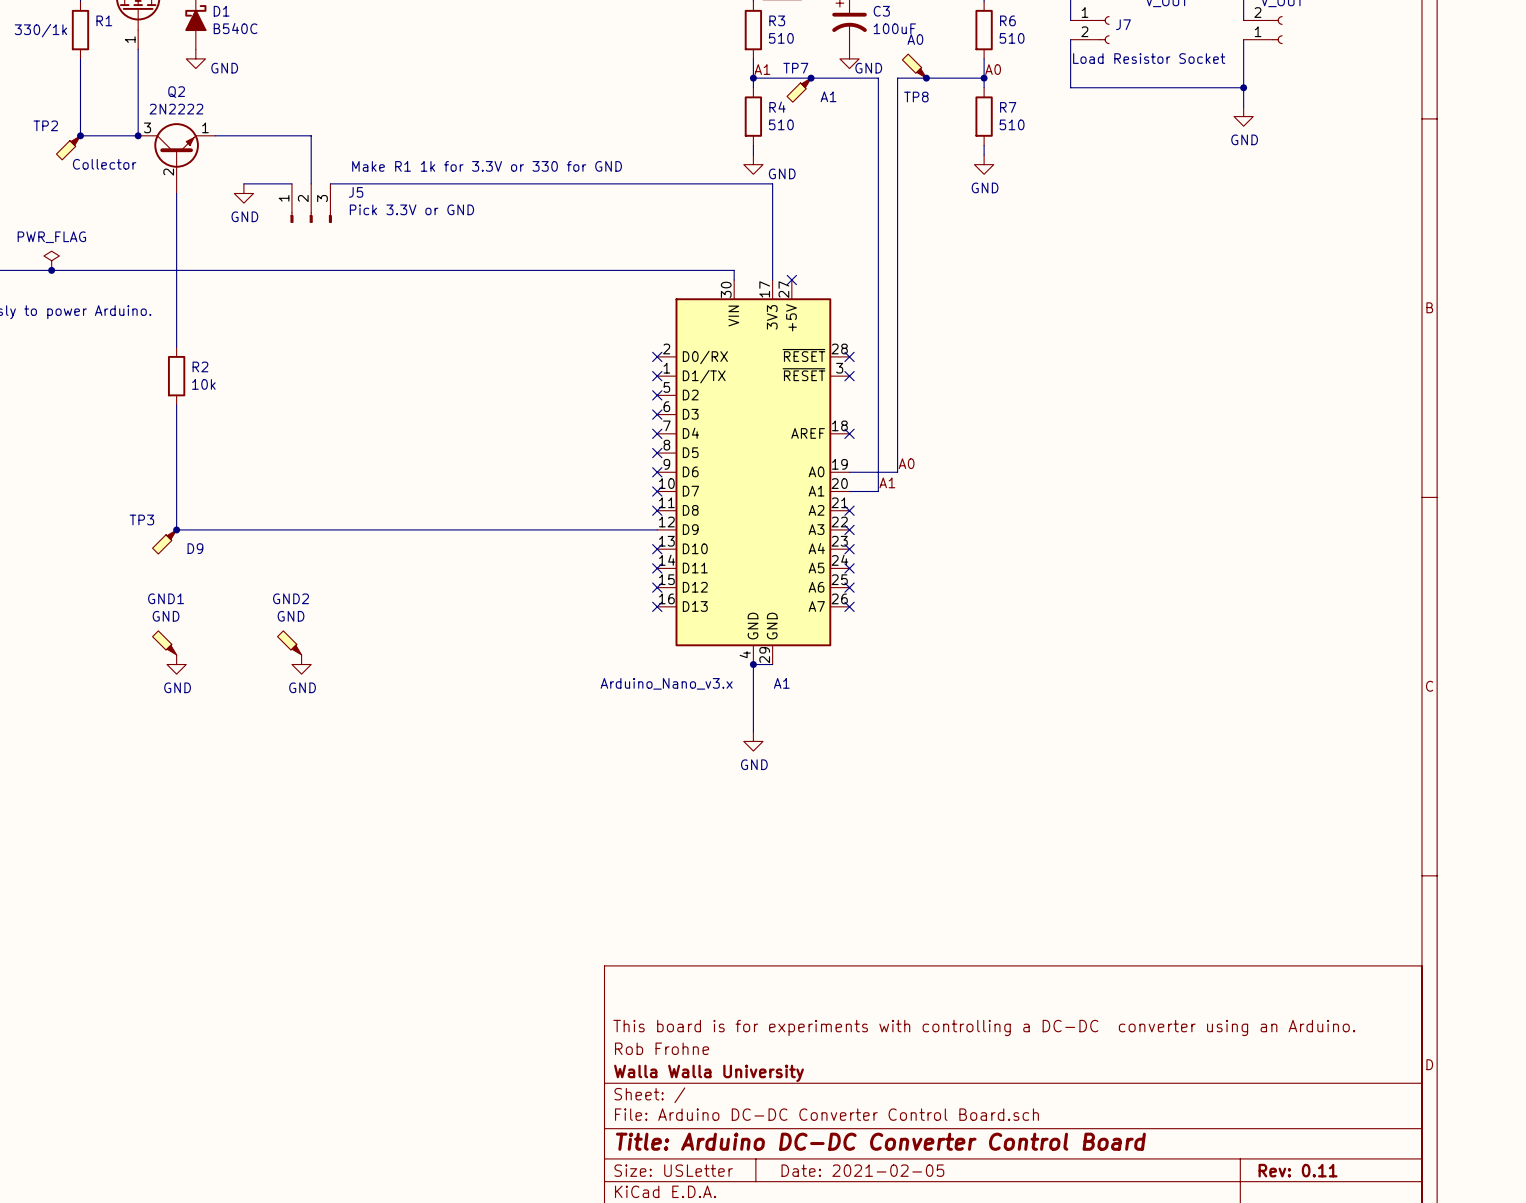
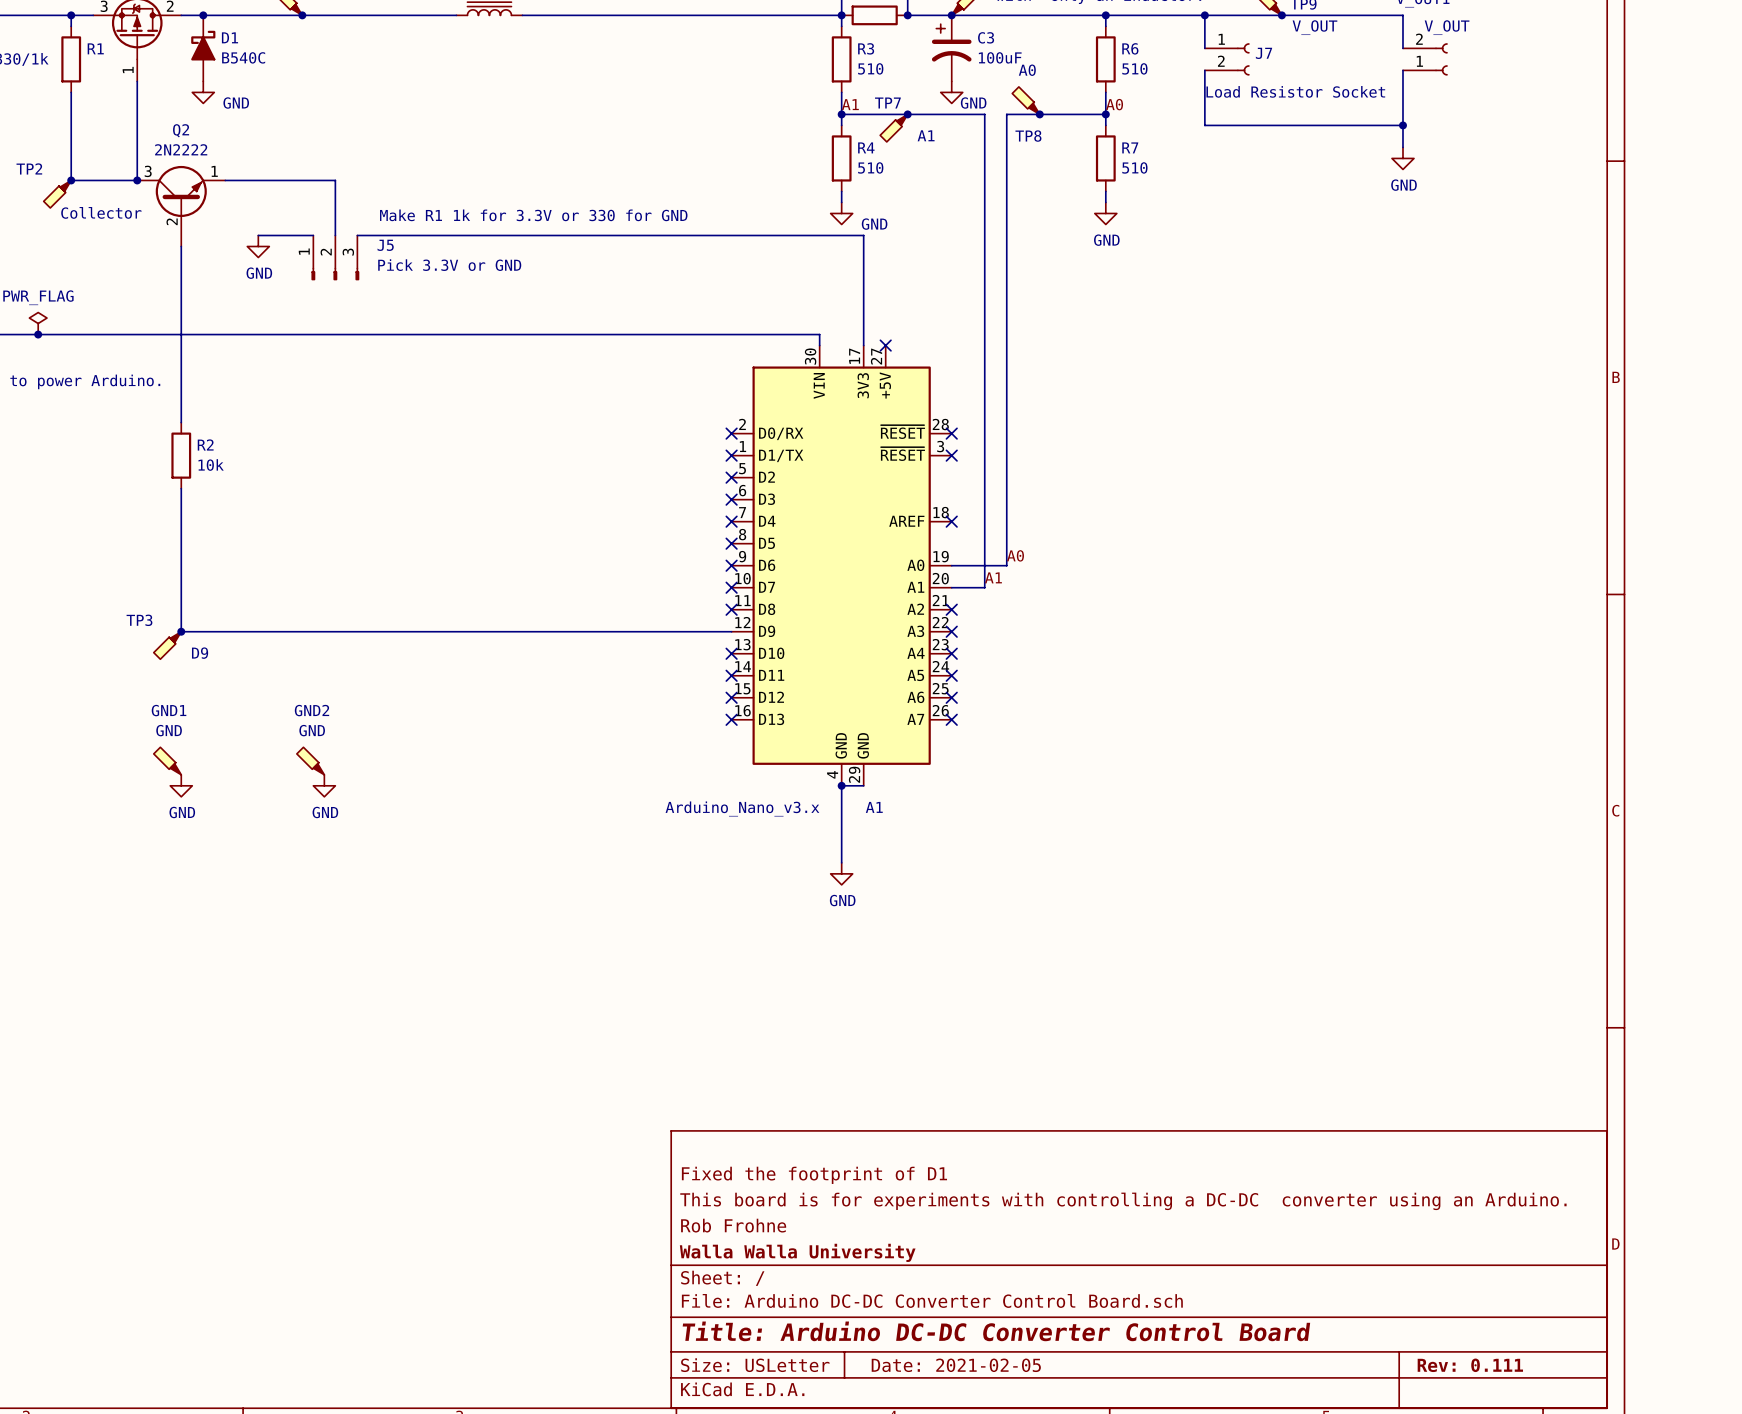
title block: none -> Fixed the footprint of D1 (814, 1175)
title block: Rev: 0.11 (1298, 1170) -> Rev: 0.111 (1470, 1365)

